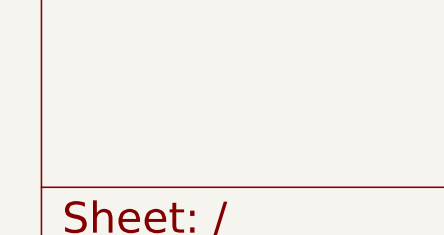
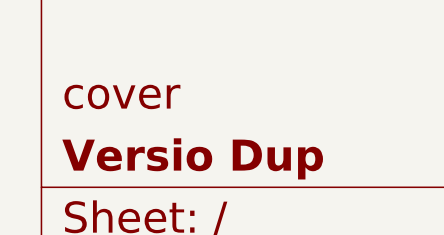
title block: none -> cover (122, 96)
title block: none -> Versio Dup (192, 158)

